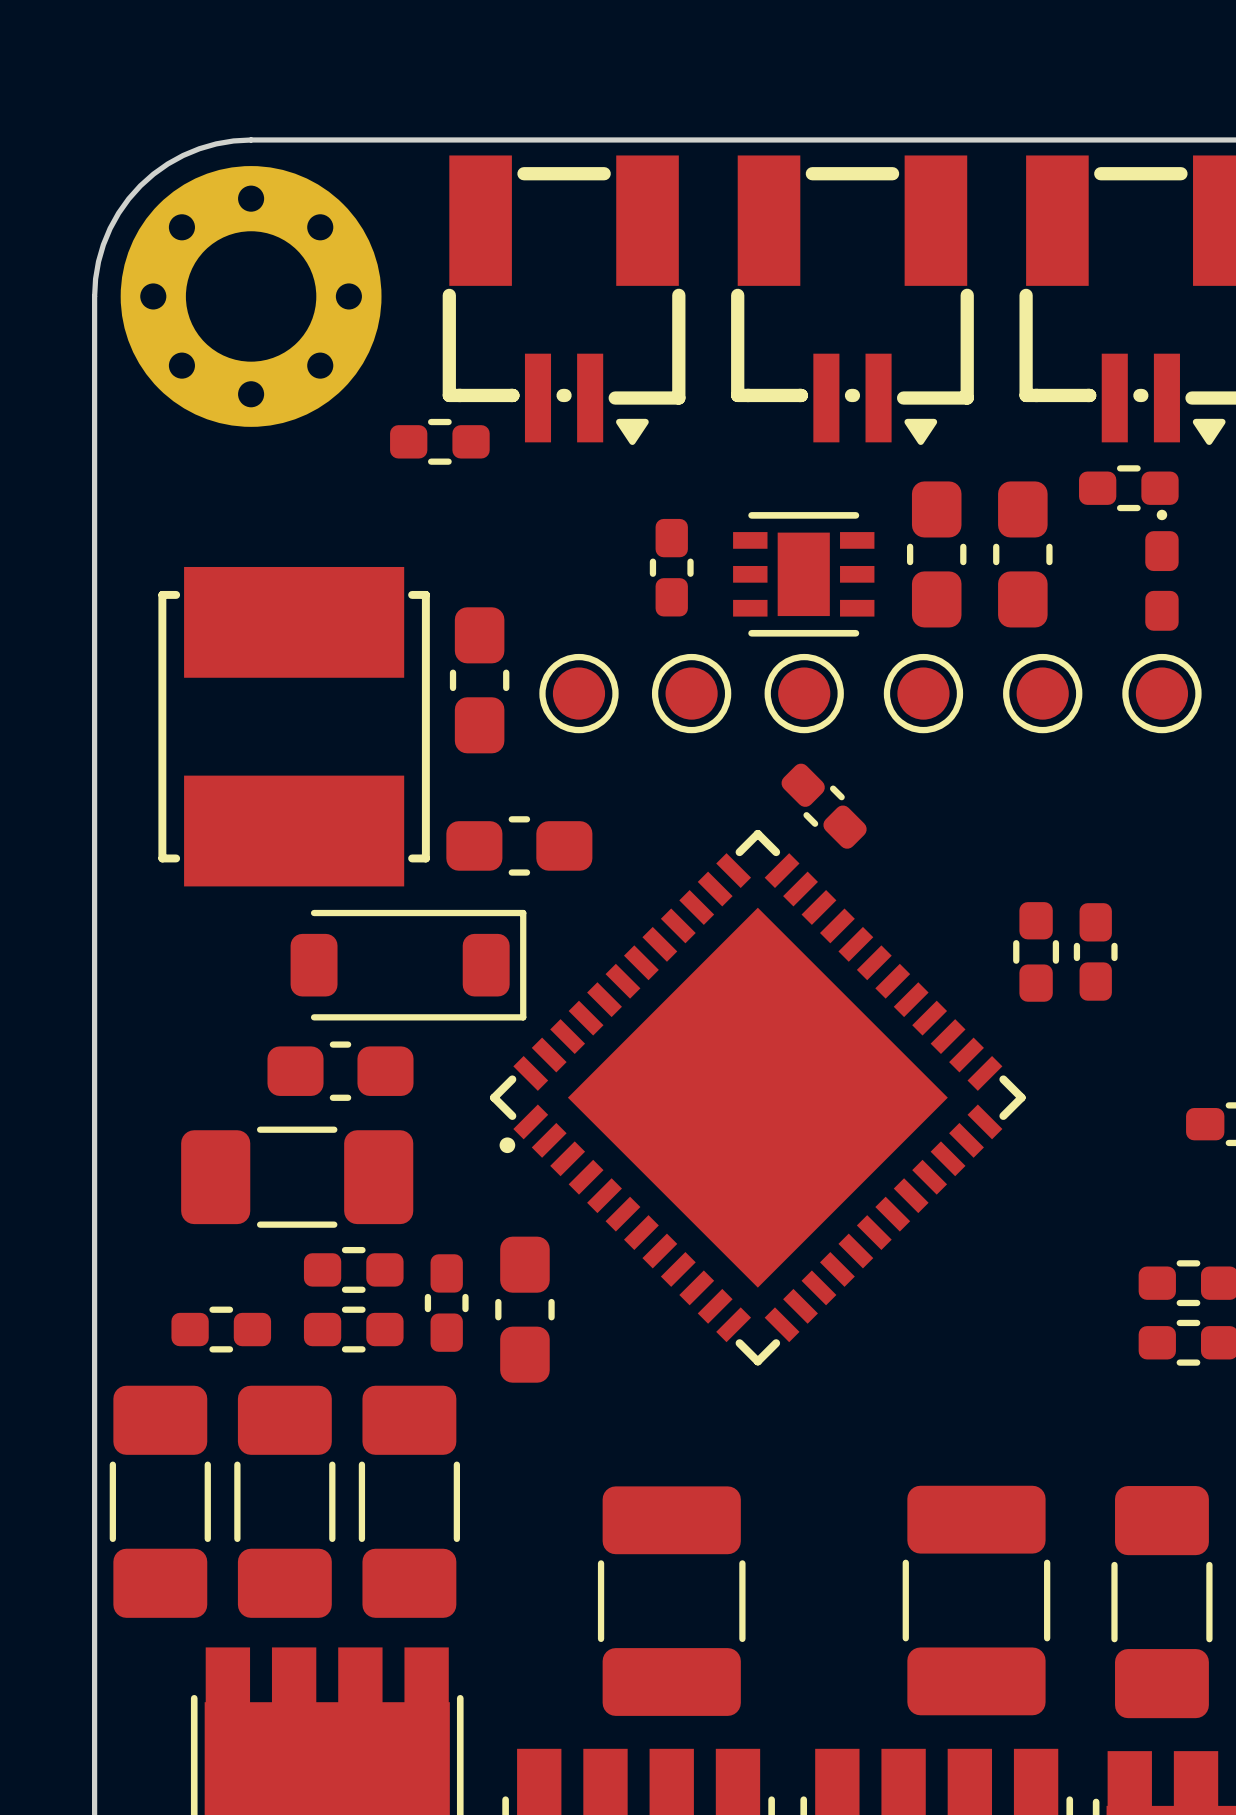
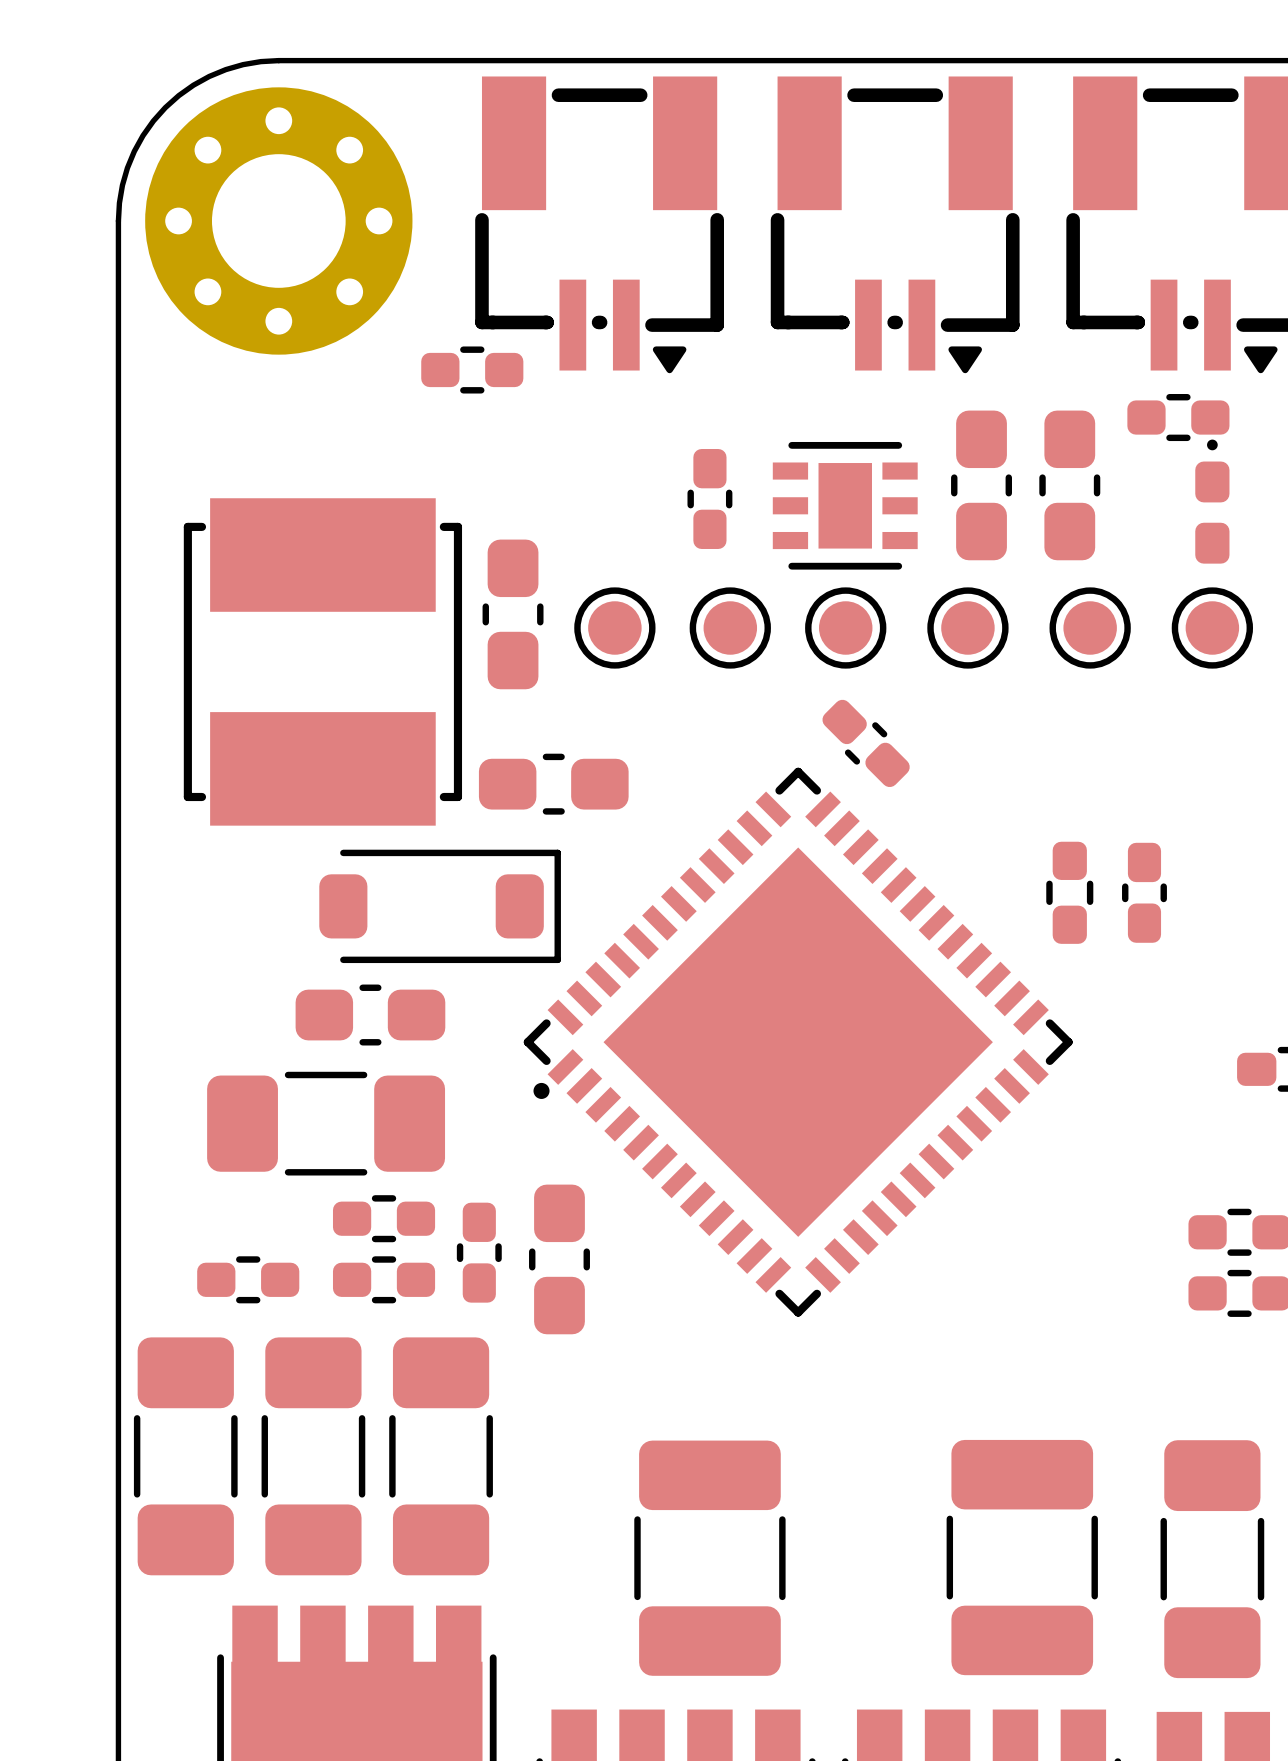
part position: (1036, 951) -> (1069, 892)

